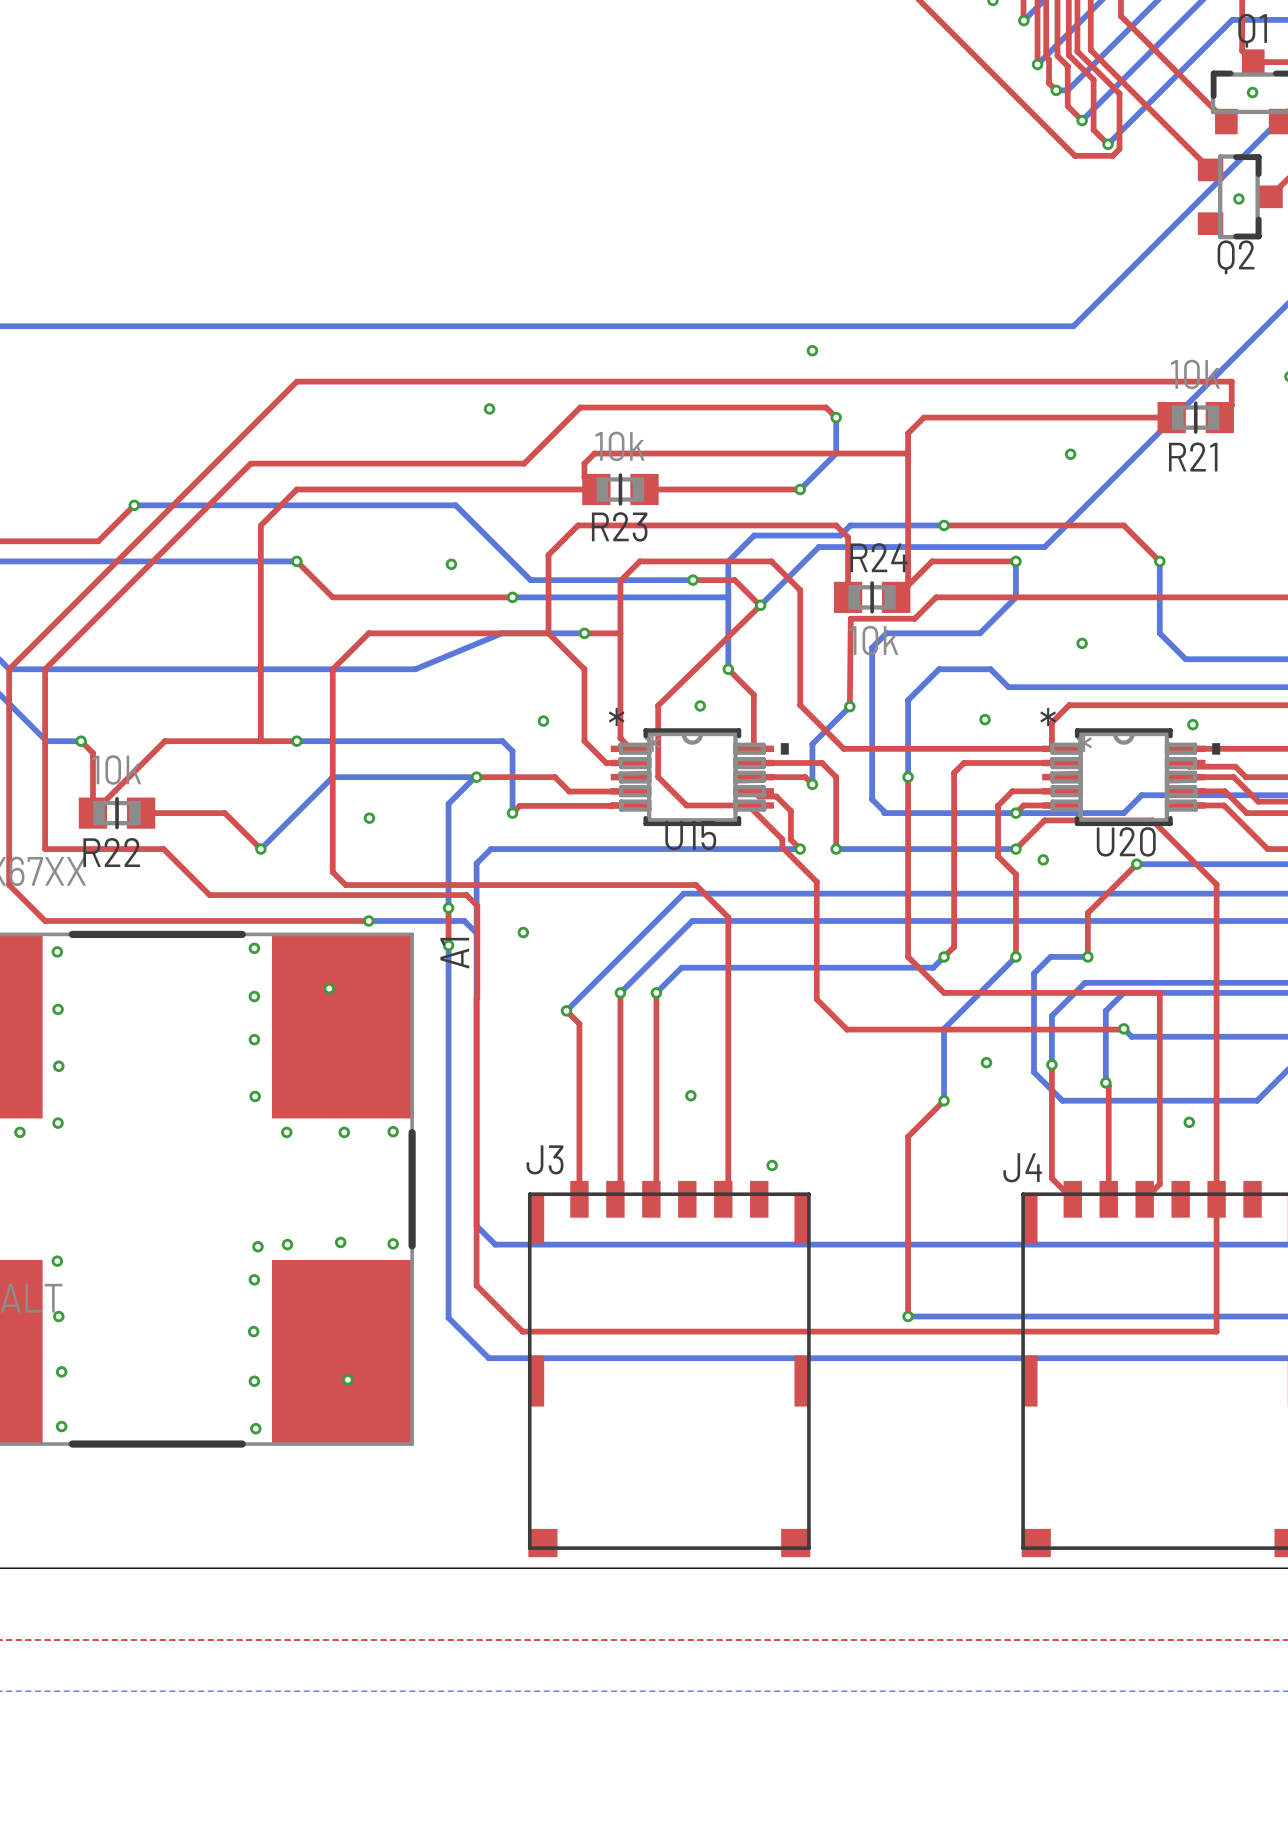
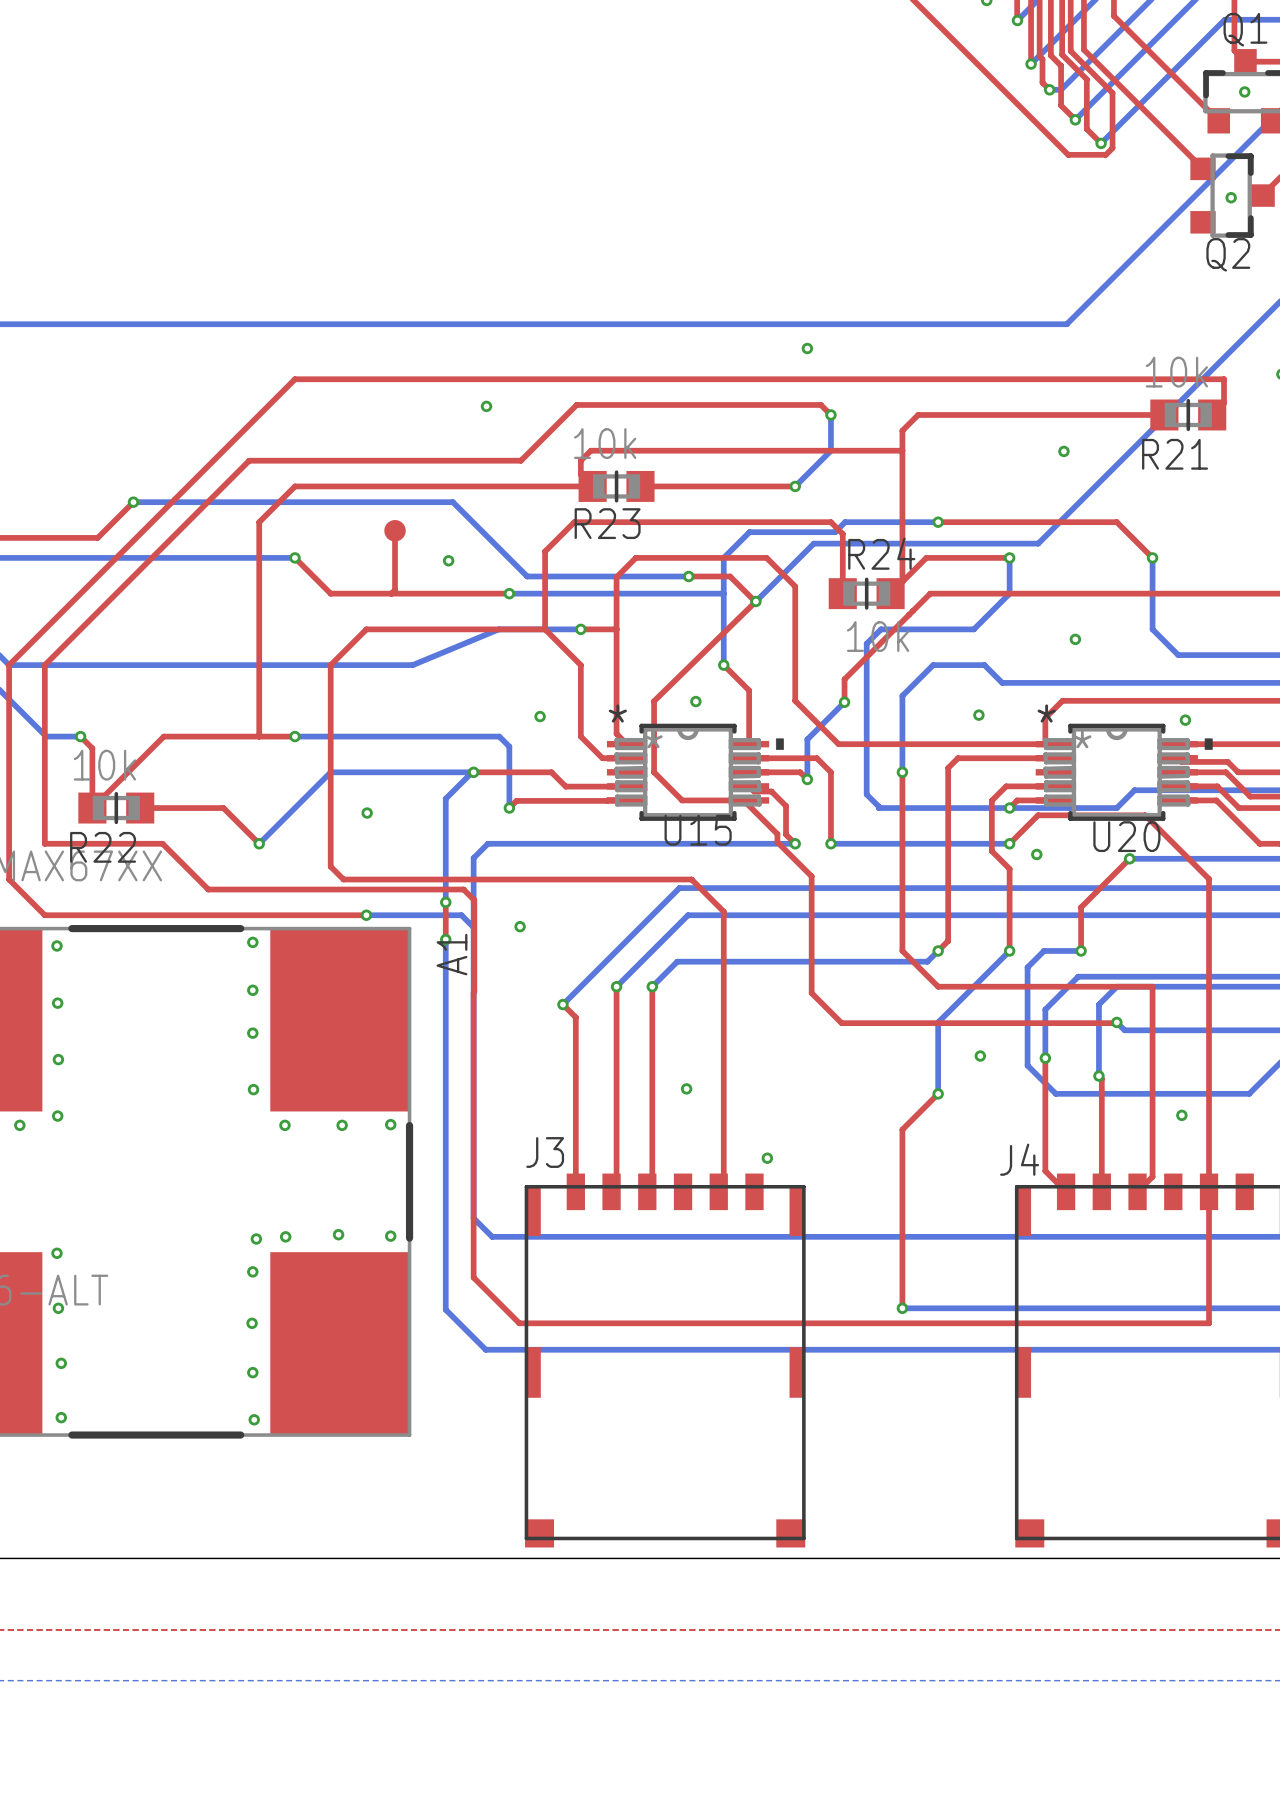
top track: none -> (395, 530) (395, 590) (391, 593)
part: none -> (395, 530)
top track: (914, 618) (850, 618) (849, 706) -> (909, 614) (844, 679) (844, 702)
via: (329, 988) -> none
via: (347, 1379) -> none

